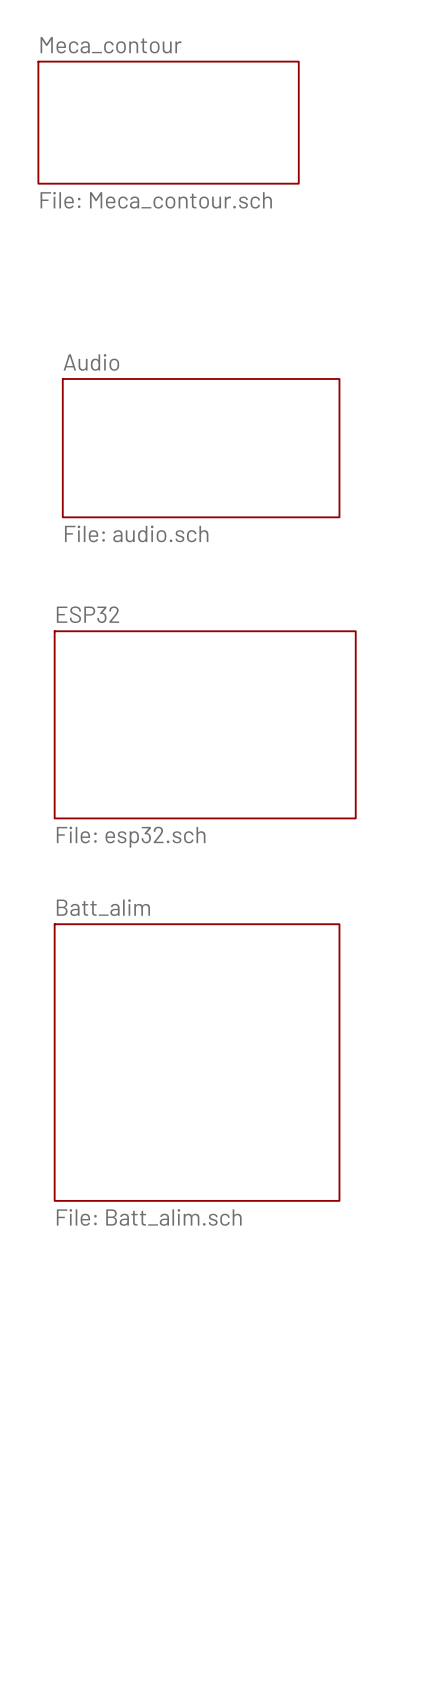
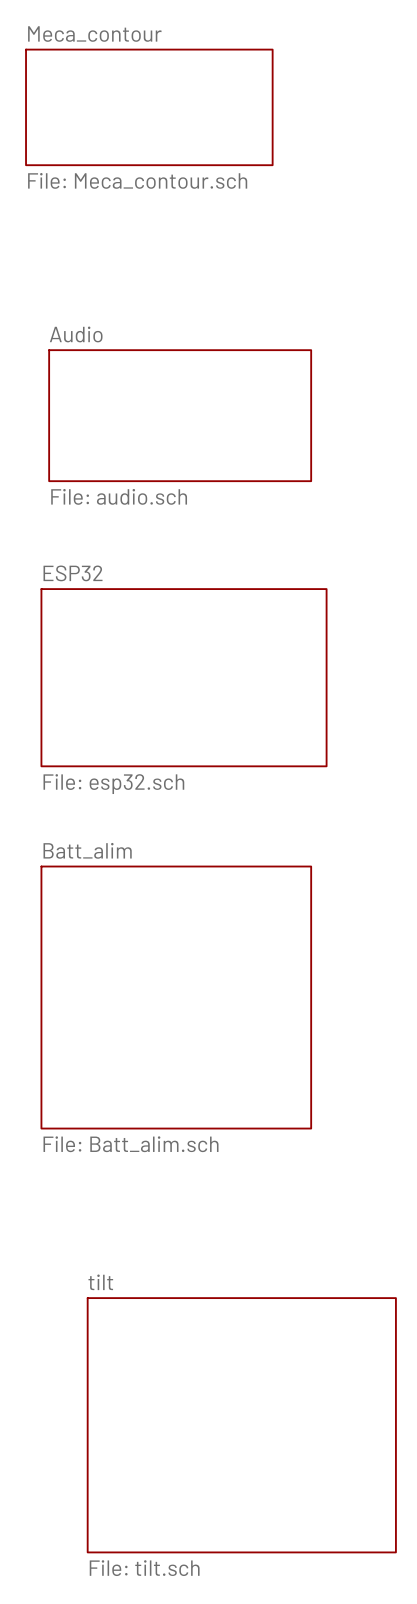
sheet tilt: none -> File: tilt.sch (241, 1425)

